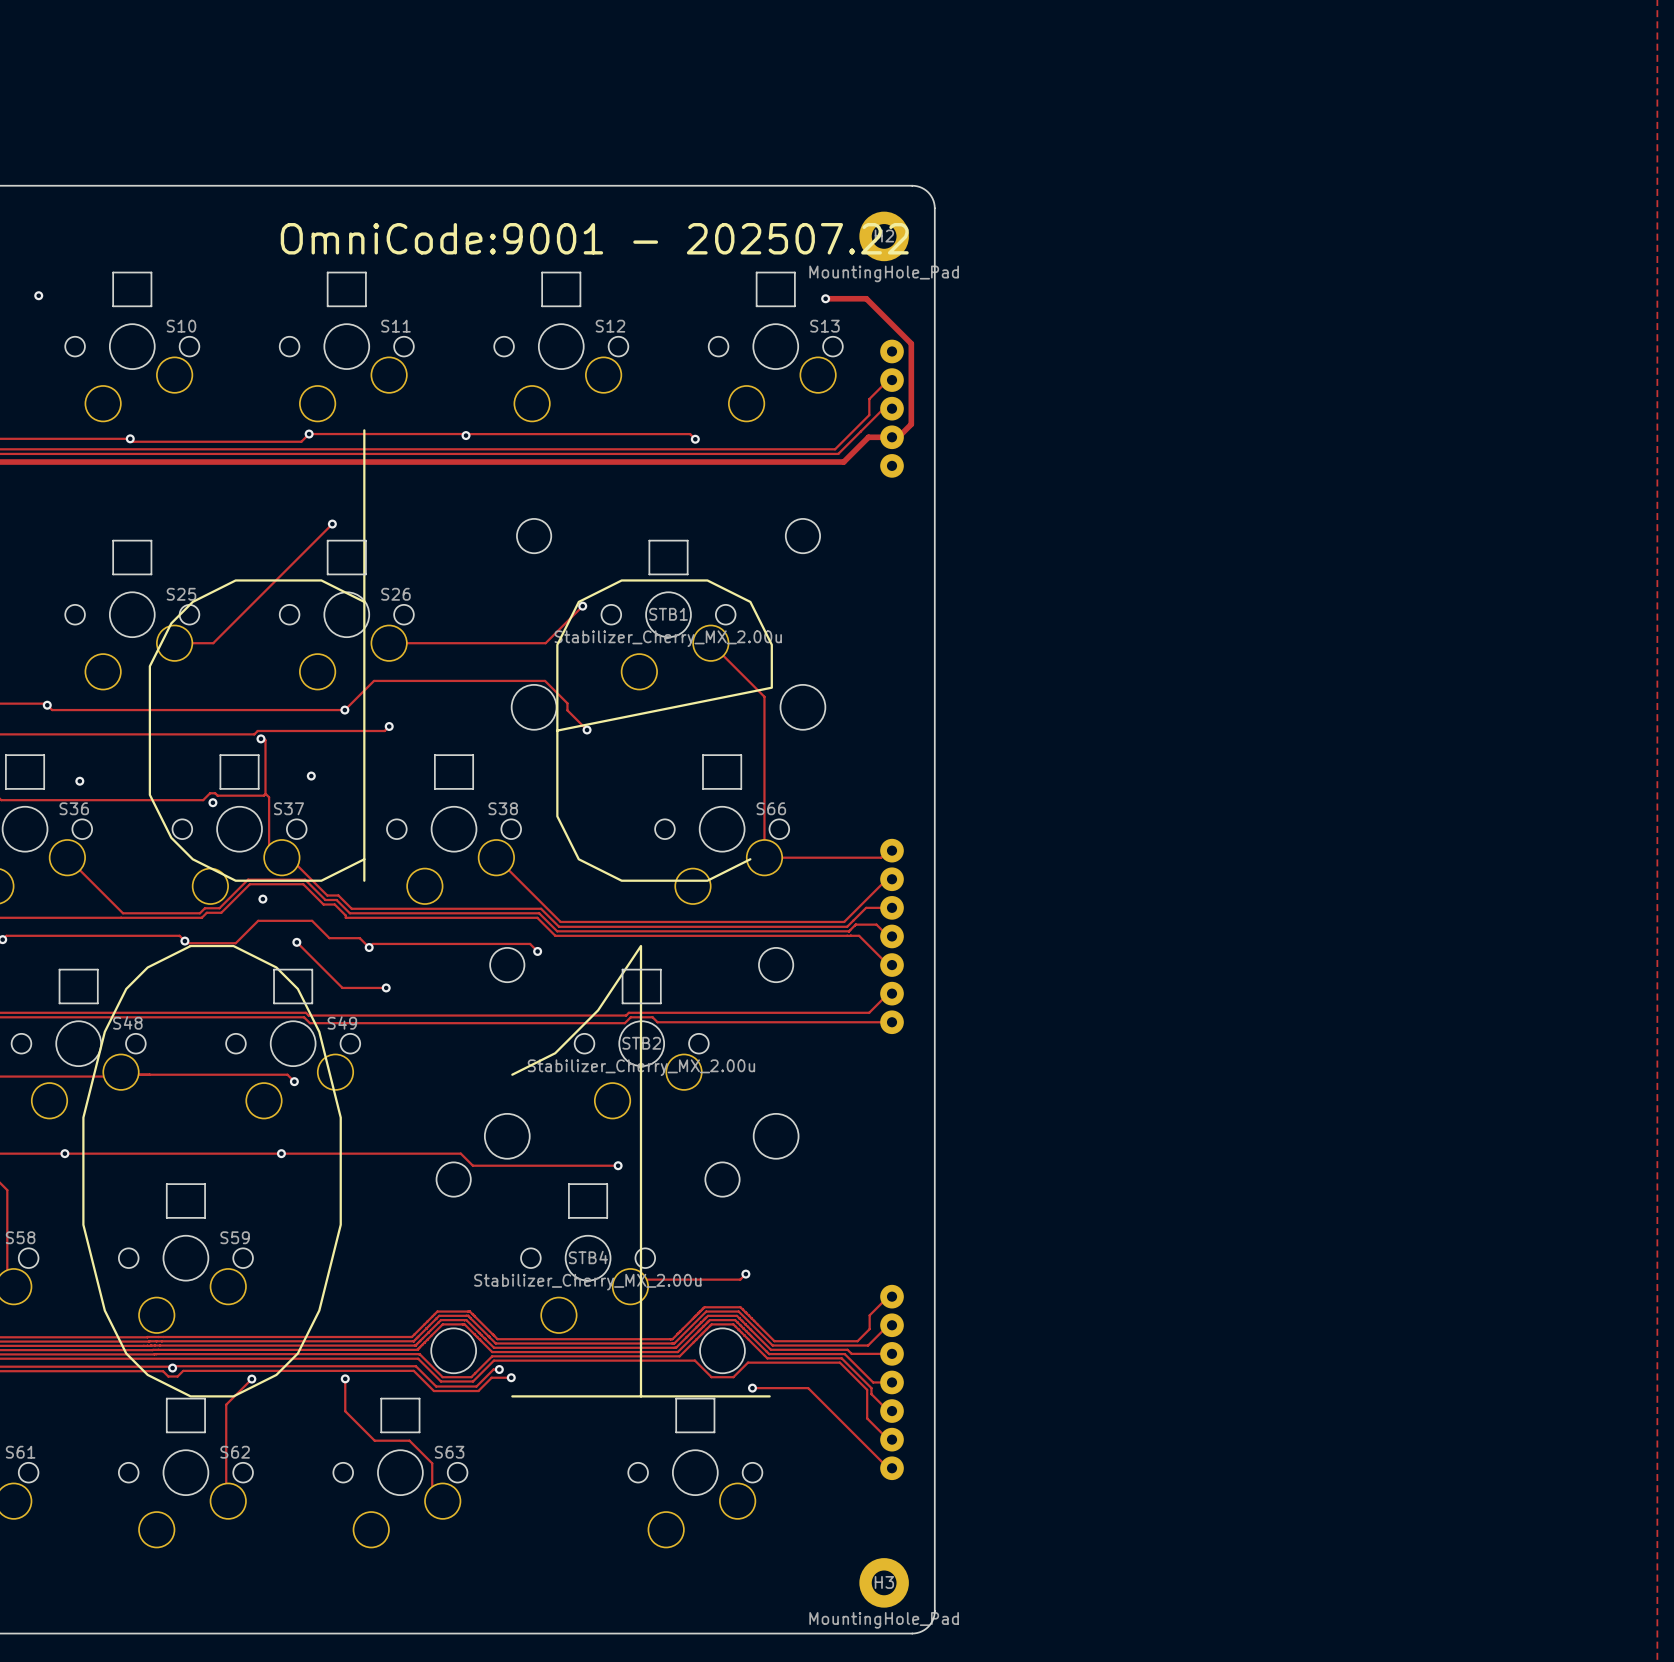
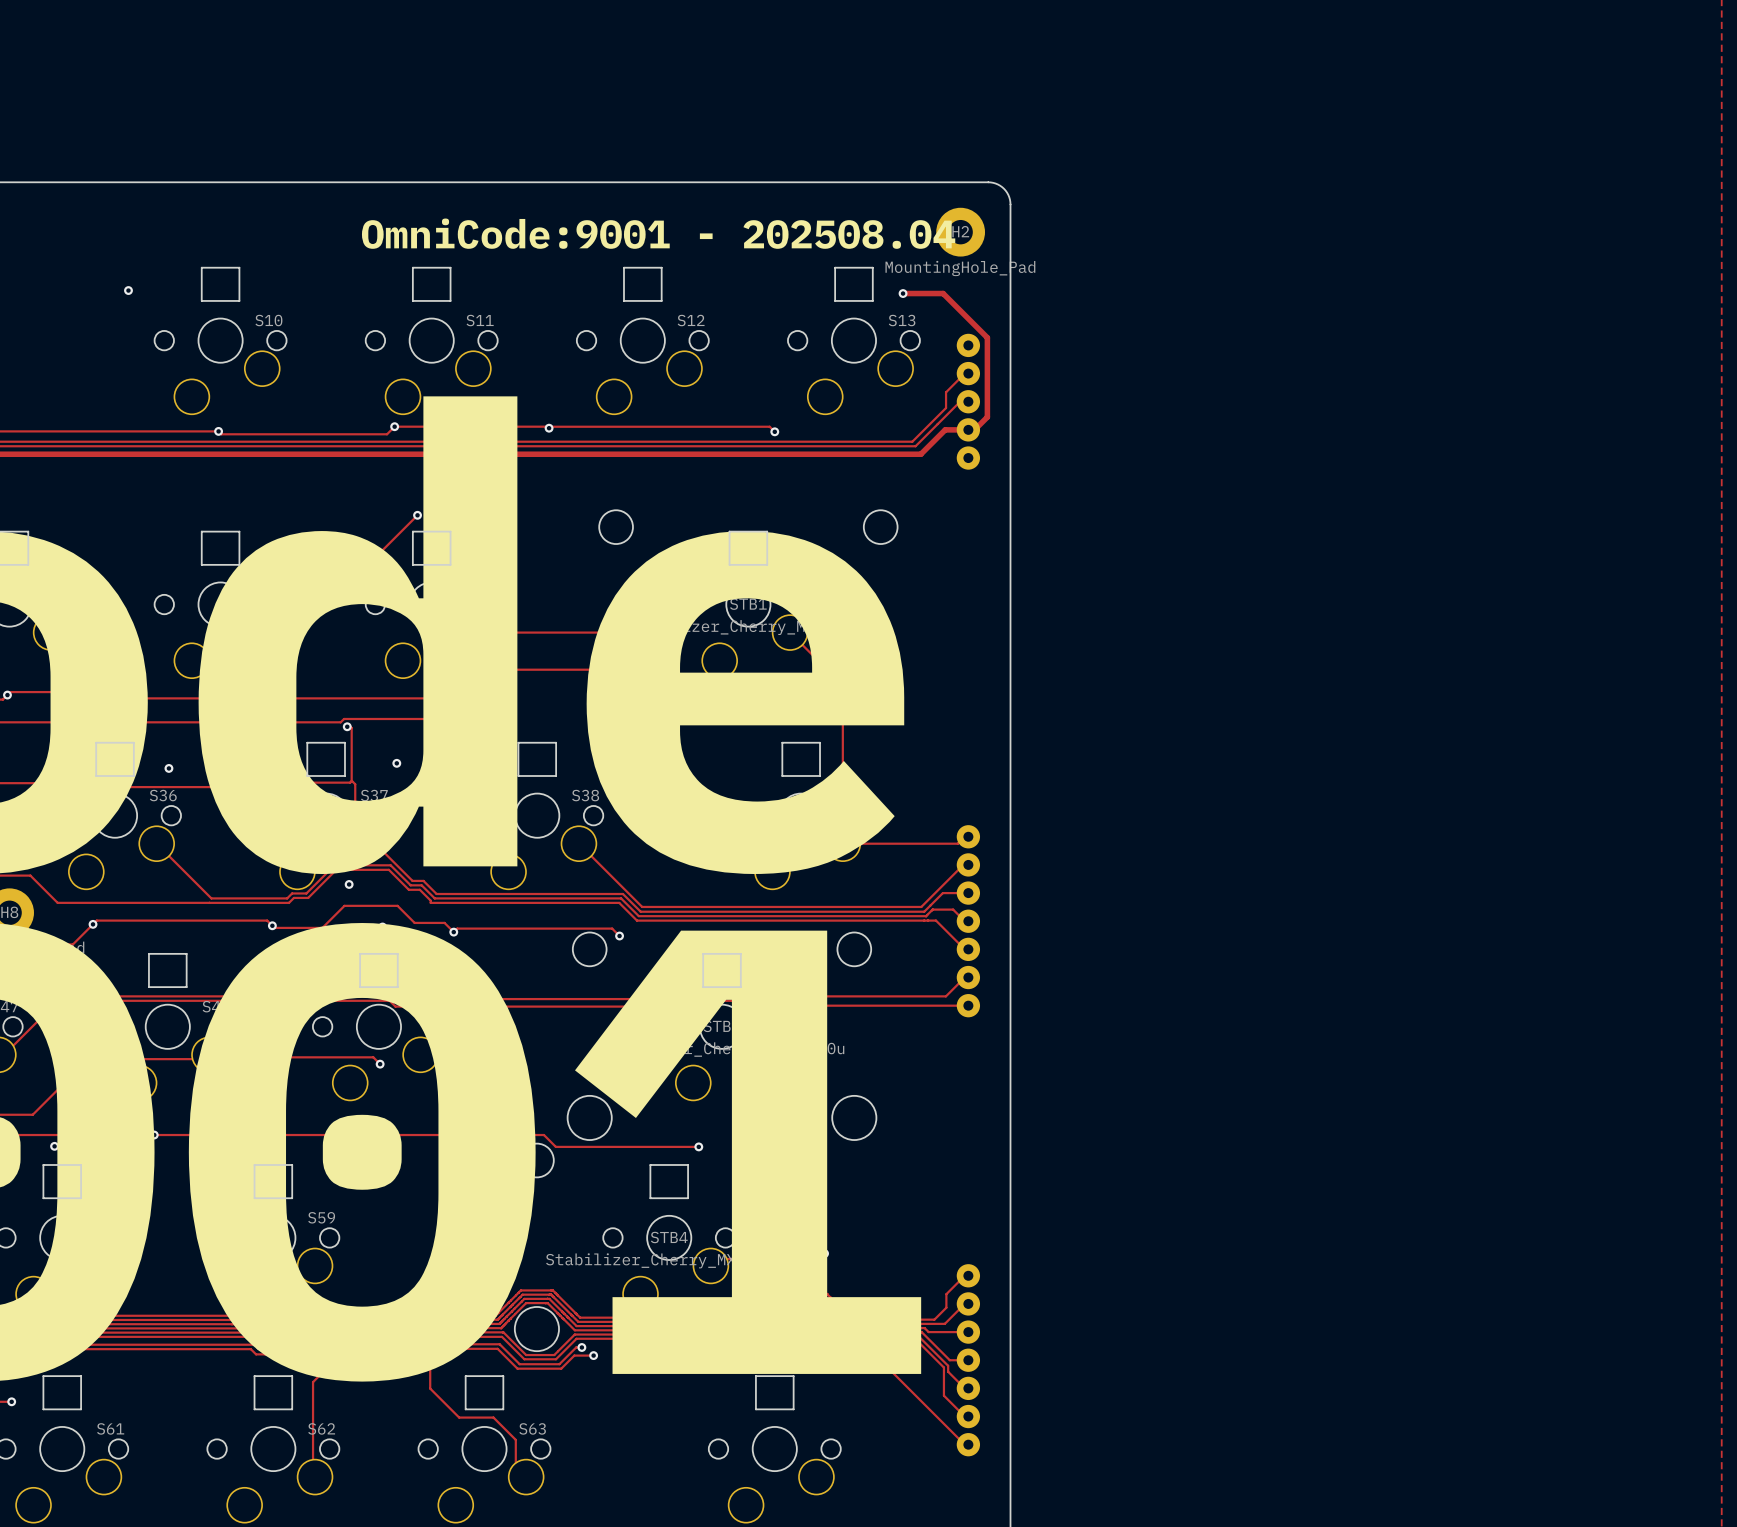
text: OmniCode:9001 - 202507.22 (594, 238) -> OmniCode:9001 - 202508.04 (658, 233)

